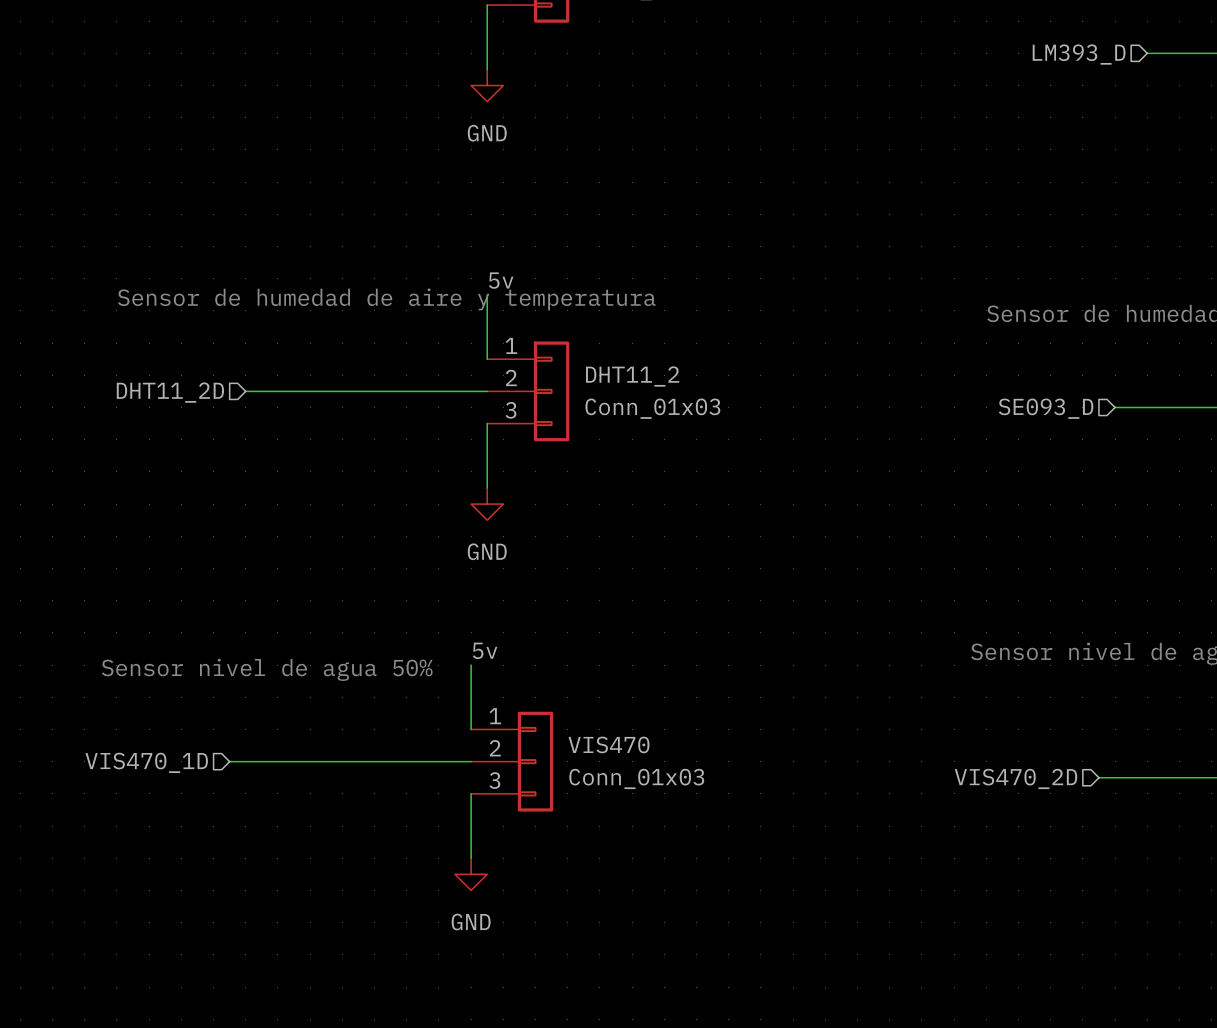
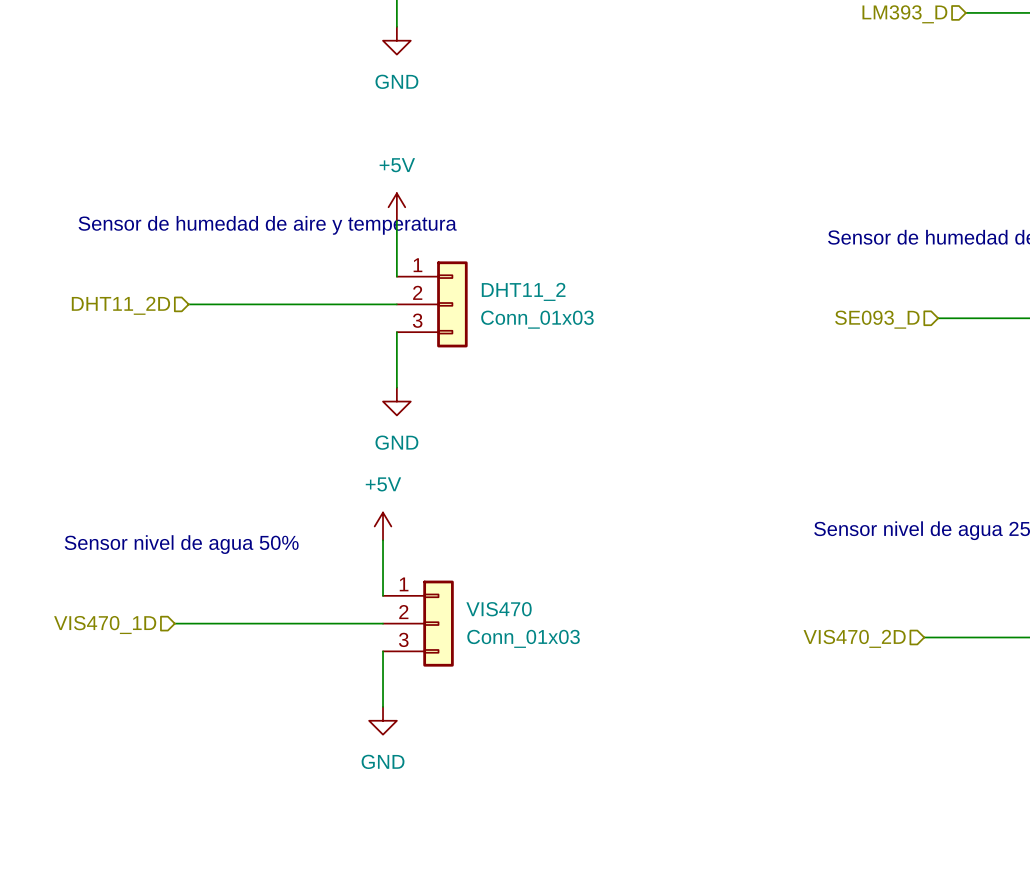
power symbol: none -> +5V (396, 207)
label: 5v (501, 280) -> none
power symbol: none -> +5V (383, 526)
label: 5v (485, 650) -> none

